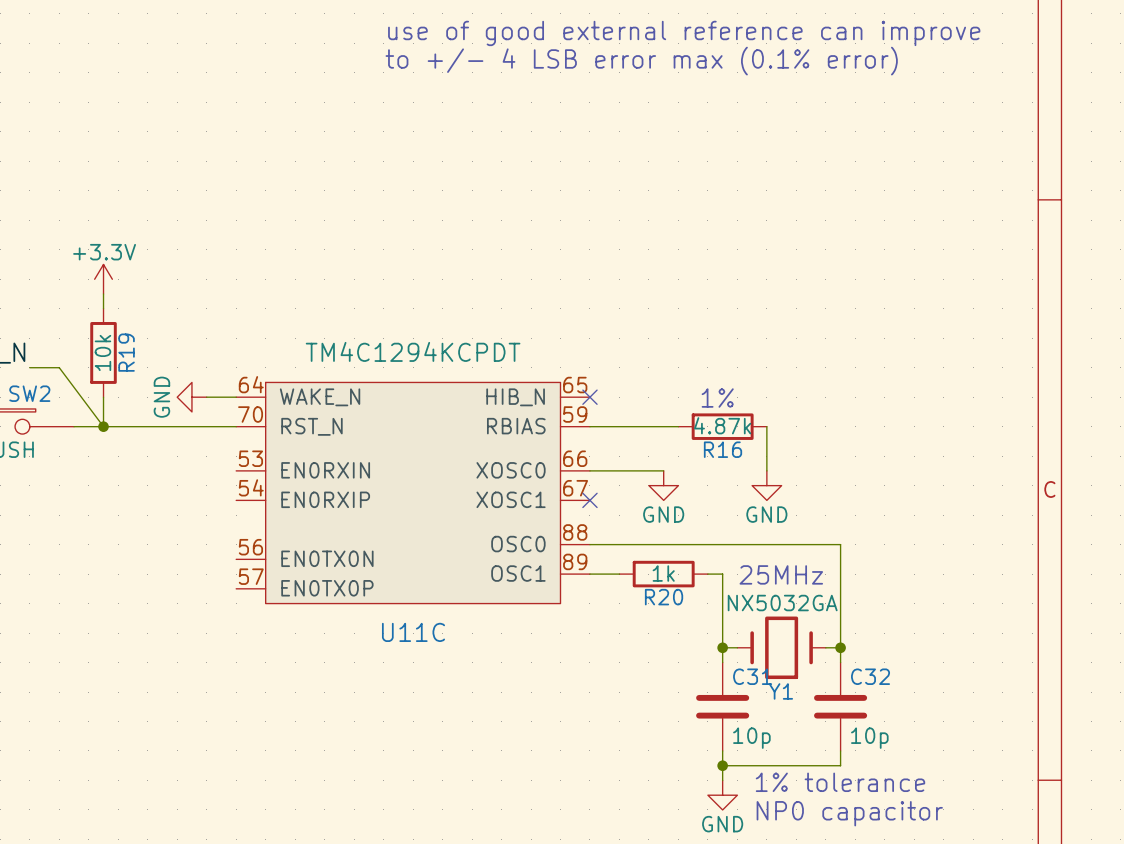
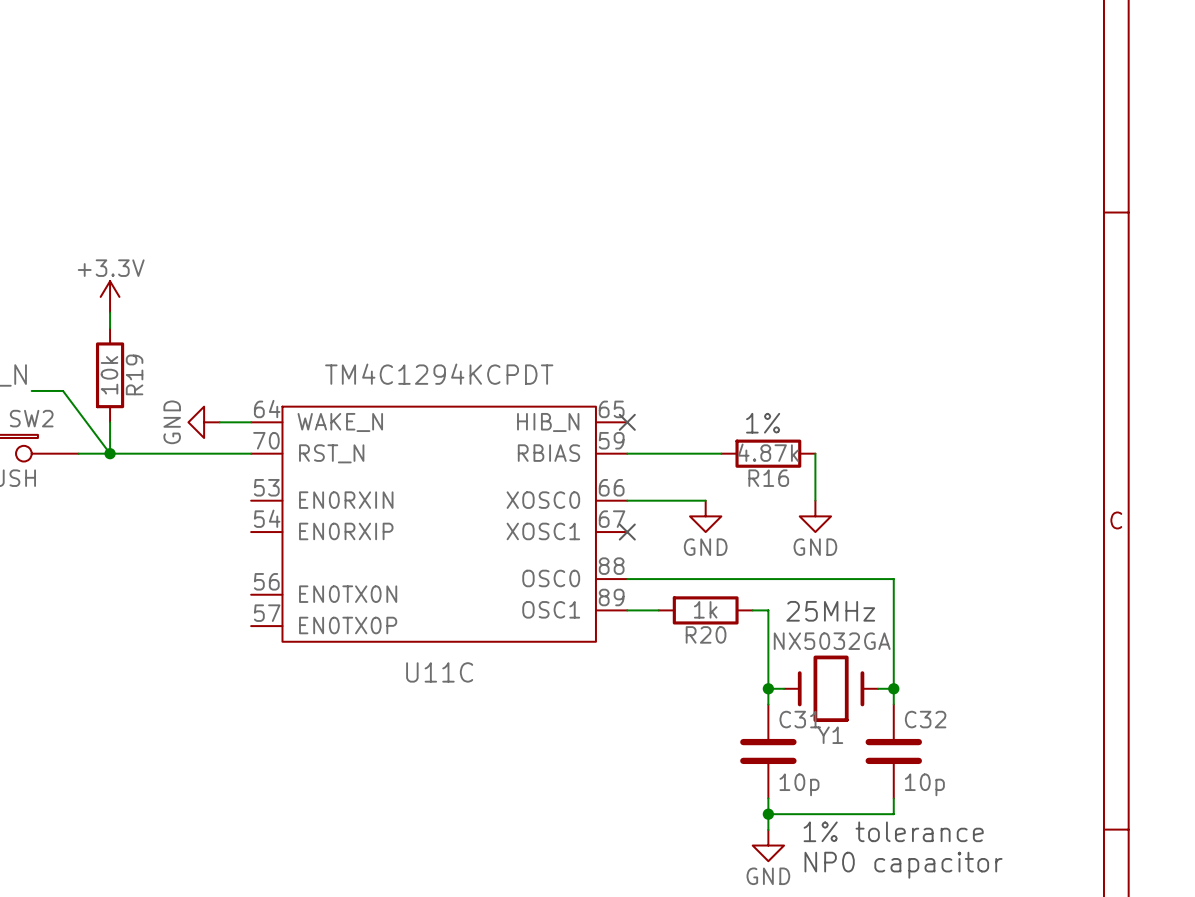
text: use of good external reference can improve (684, 33) -> none
text: to +/- 4 LSB error max (0.1% error) (641, 61) -> none

